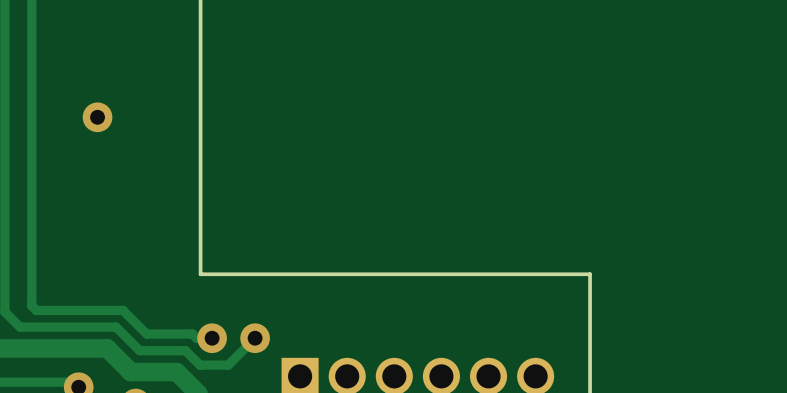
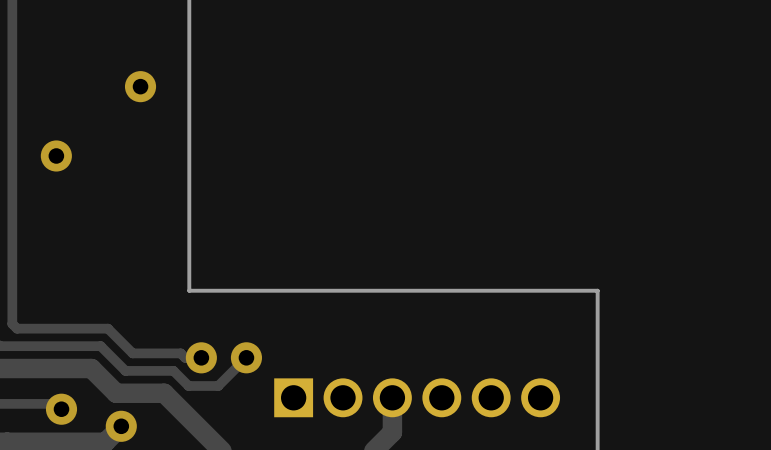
via: none -> (140, 86)
via position: (97, 117) -> (56, 155)

